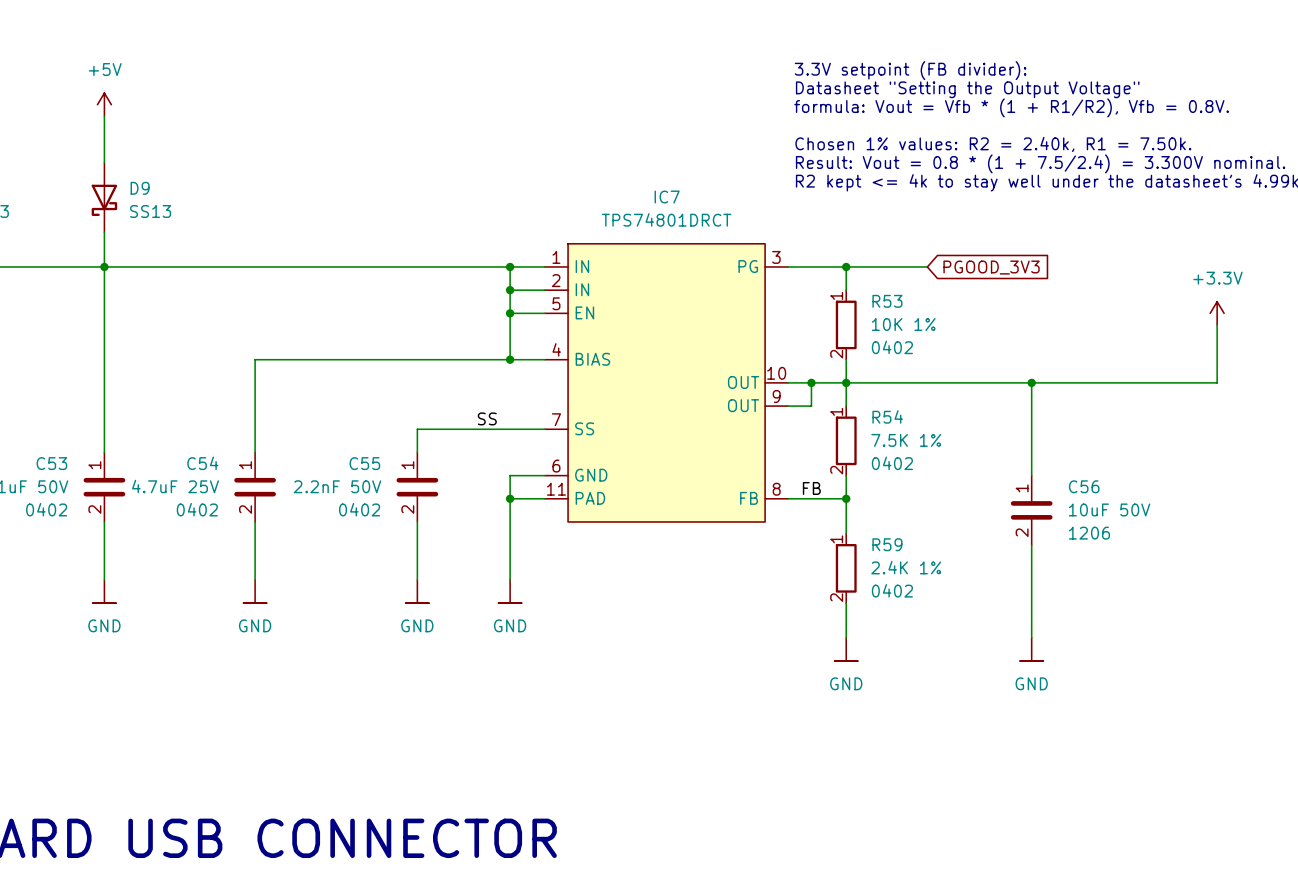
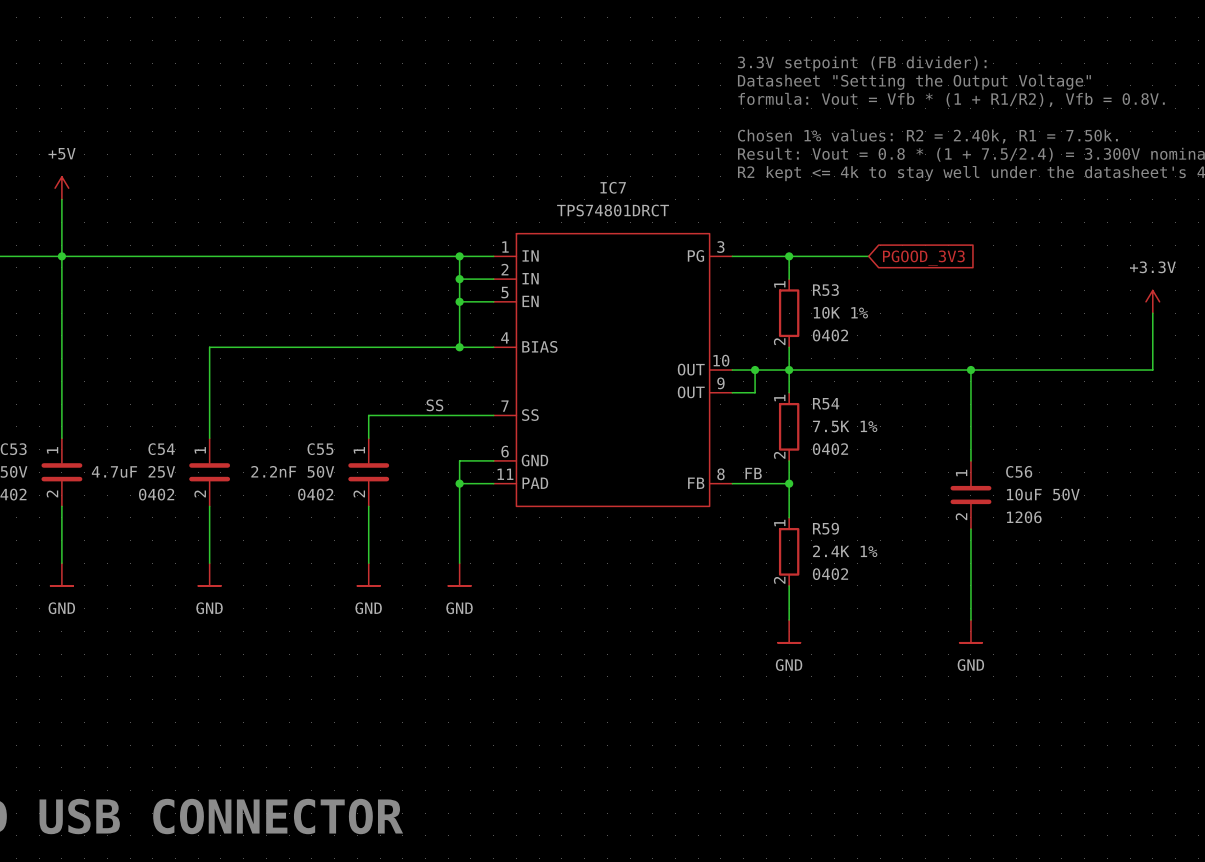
power symbol position: +5V (104, 104) -> +5V (61, 188)
wire: (104, 116) (104, 162) -> none
D9: SS13 (104, 197) -> none

